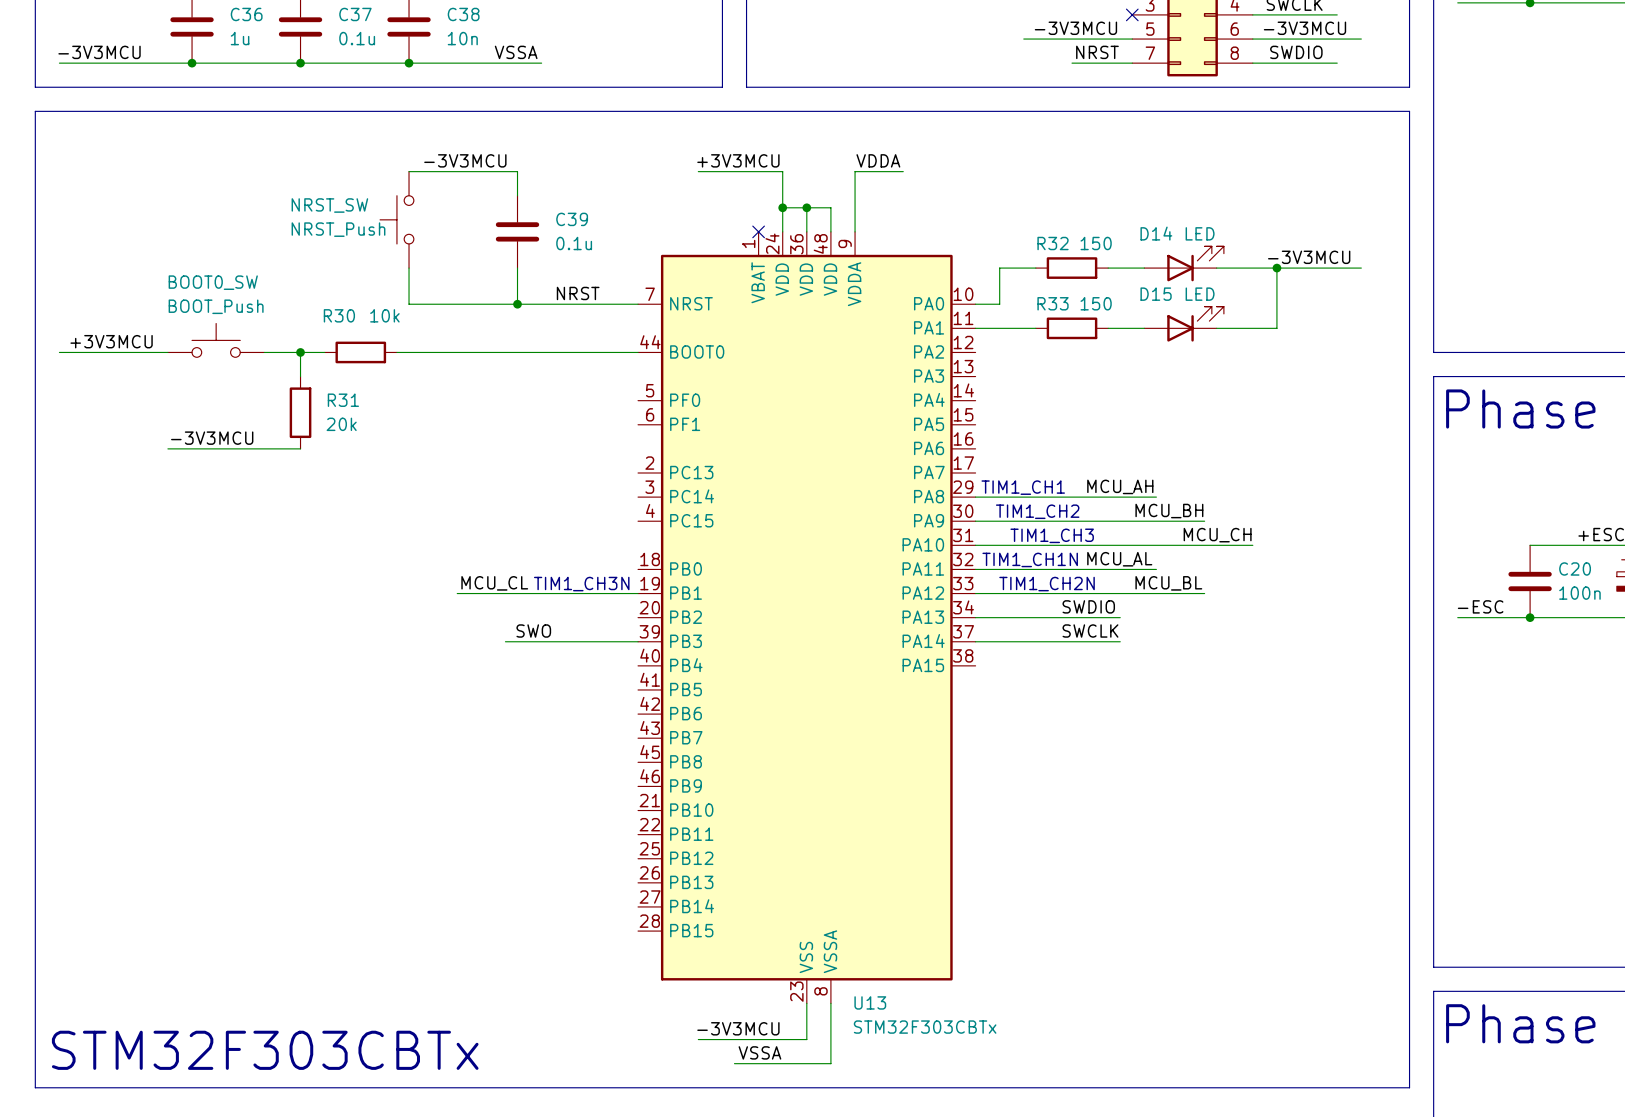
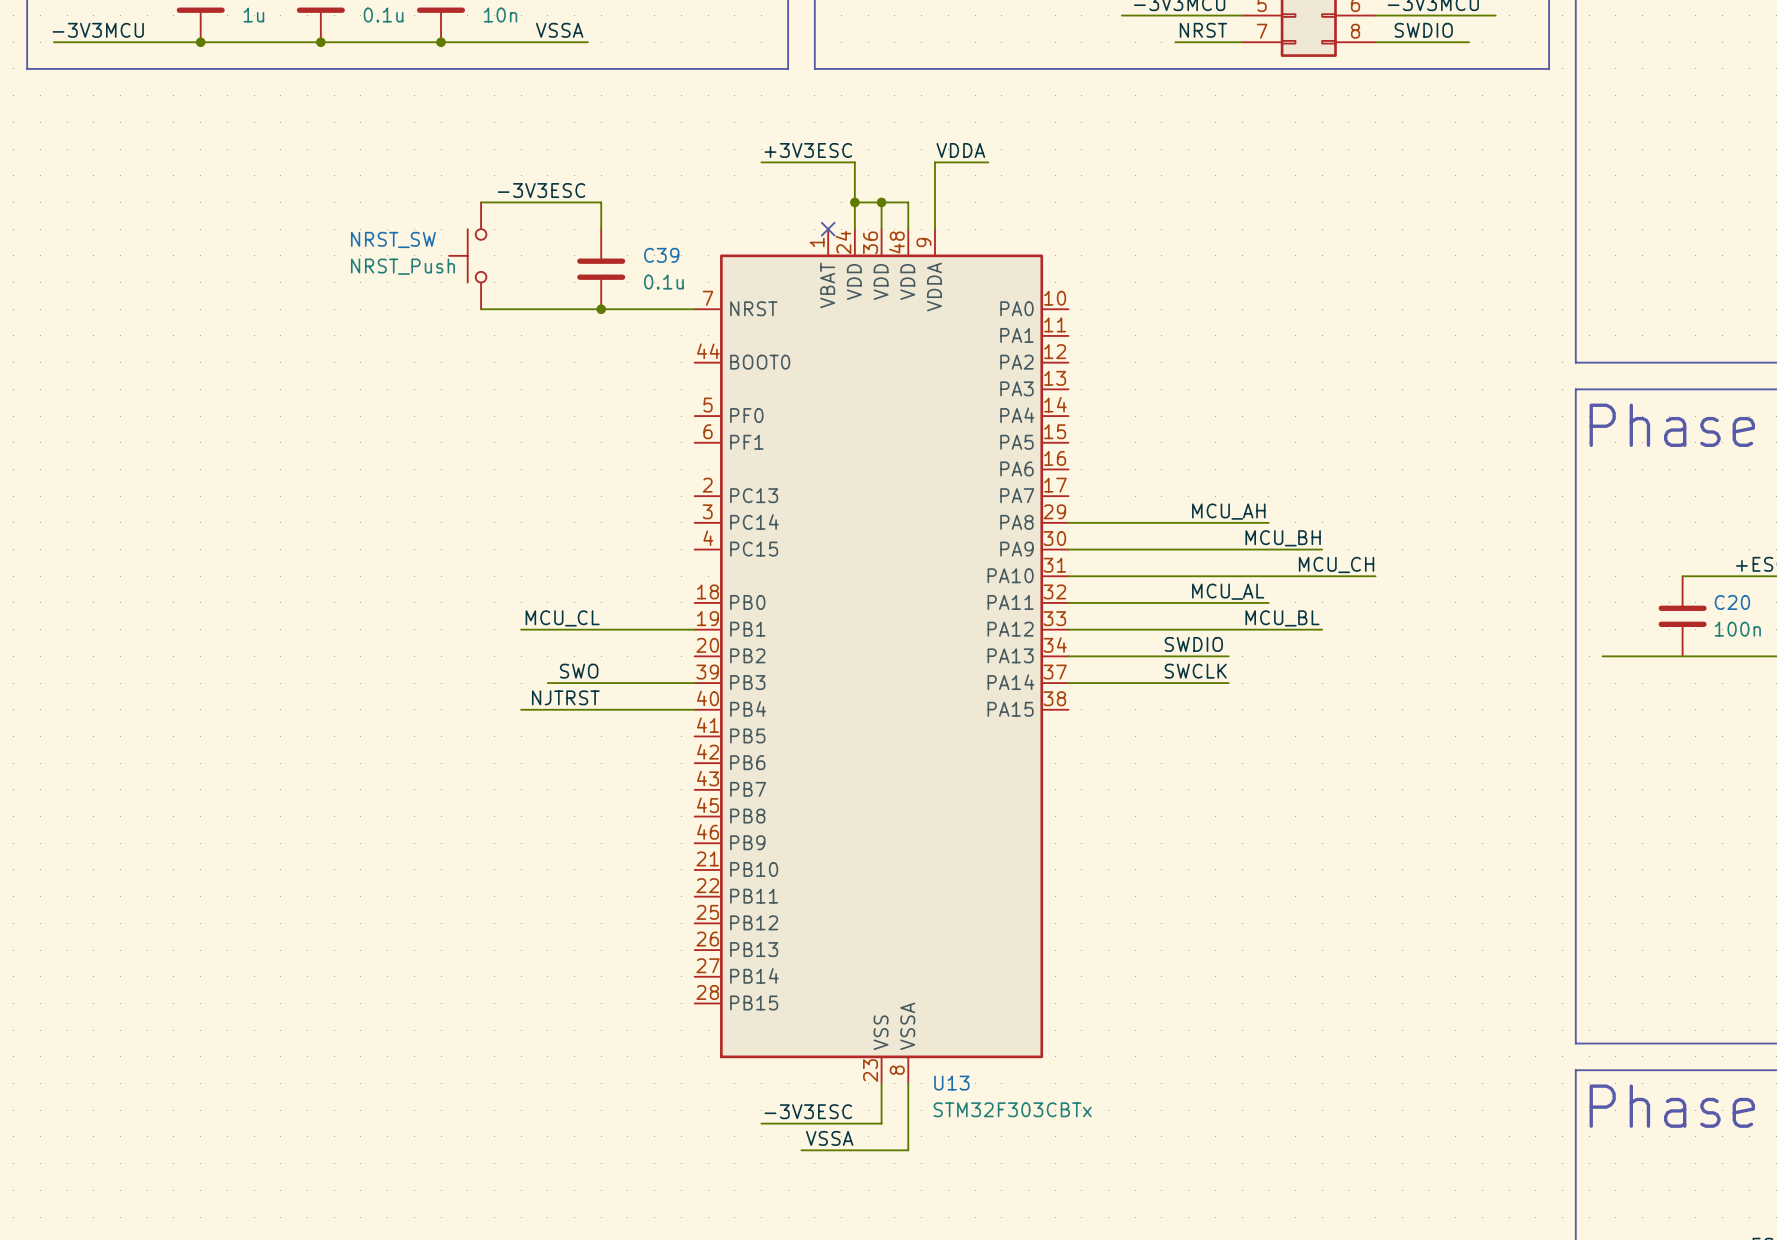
line: (35, 111) (35, 1087) (1409, 1087) (1409, 111) (35, 111) -> none
label: -3V3MCU (465, 160) -> none
label: +3V3MCU (738, 160) -> +3V3ESC (808, 150)
wire: (409, 171) (517, 171) (517, 195) -> (481, 202) (601, 202) (601, 229)
label: none -> -3V3ESC (541, 190)
NRST_SW position: (396, 219) -> (467, 255)
C39 position: (517, 231) -> (601, 269)
label: -3V3MCU (1309, 257) -> none
D14: LED (1184, 263) -> none
wire: (409, 268) (409, 304) (445, 304) -> none
wire: (517, 268) (517, 304) -> none
wire: (1035, 268) (999, 268) (999, 304) (975, 304) -> none
R32: 150 (1072, 268) -> none
wire: (1108, 268) (1144, 268) -> none
wire: (1216, 268) (1361, 268) -> none
wire: (1276, 268) (1276, 328) (1216, 328) -> none
junction: (1276, 268) -> none
label: NRST (578, 293) -> none
junction position: (517, 304) -> (601, 309)
D15: LED (1184, 324) -> none
wire: (975, 328) (1035, 328) -> none
R33: 150 (1072, 328) -> none
wire: (1108, 328) (1144, 328) -> none
BOOT0_SW: BOOT_Push (216, 340) -> none
label: +3V3MCU (111, 341) -> none
wire: (59, 352) (167, 352) -> none
wire: (264, 352) (324, 352) -> none
wire: (300, 352) (300, 376) -> none
junction: (300, 352) -> none
R30: 10k (360, 352) -> none
wire: (396, 352) (638, 352) -> none
R31: 20k (300, 412) -> none
label: -3V3MCU (212, 438) -> none
wire: (167, 448) (300, 448) -> none
text: TIM1_CH1 (1023, 487) -> none
text: TIM1_CH2 (1037, 511) -> none
text: TIM1_CH3 (1052, 535) -> none
text: TIM1_CH1N (1030, 559) -> none
label position: MCU_CL (494, 583) -> MCU_CL (562, 618)
text: TIM1_CH3N (581, 584) -> none
text: TIM1_CH2N (1047, 584) -> none
wire: (457, 593) (481, 593) -> none
label: -ESC (1480, 606) -> none
junction: (1530, 617) -> none
label: none -> NJTRST (565, 697)
wire: none -> (521, 709) (694, 709)
label: -3V3MCU (738, 1028) -> -3V3ESC (808, 1111)
text: STM32F303CBTx (265, 1050) -> none

